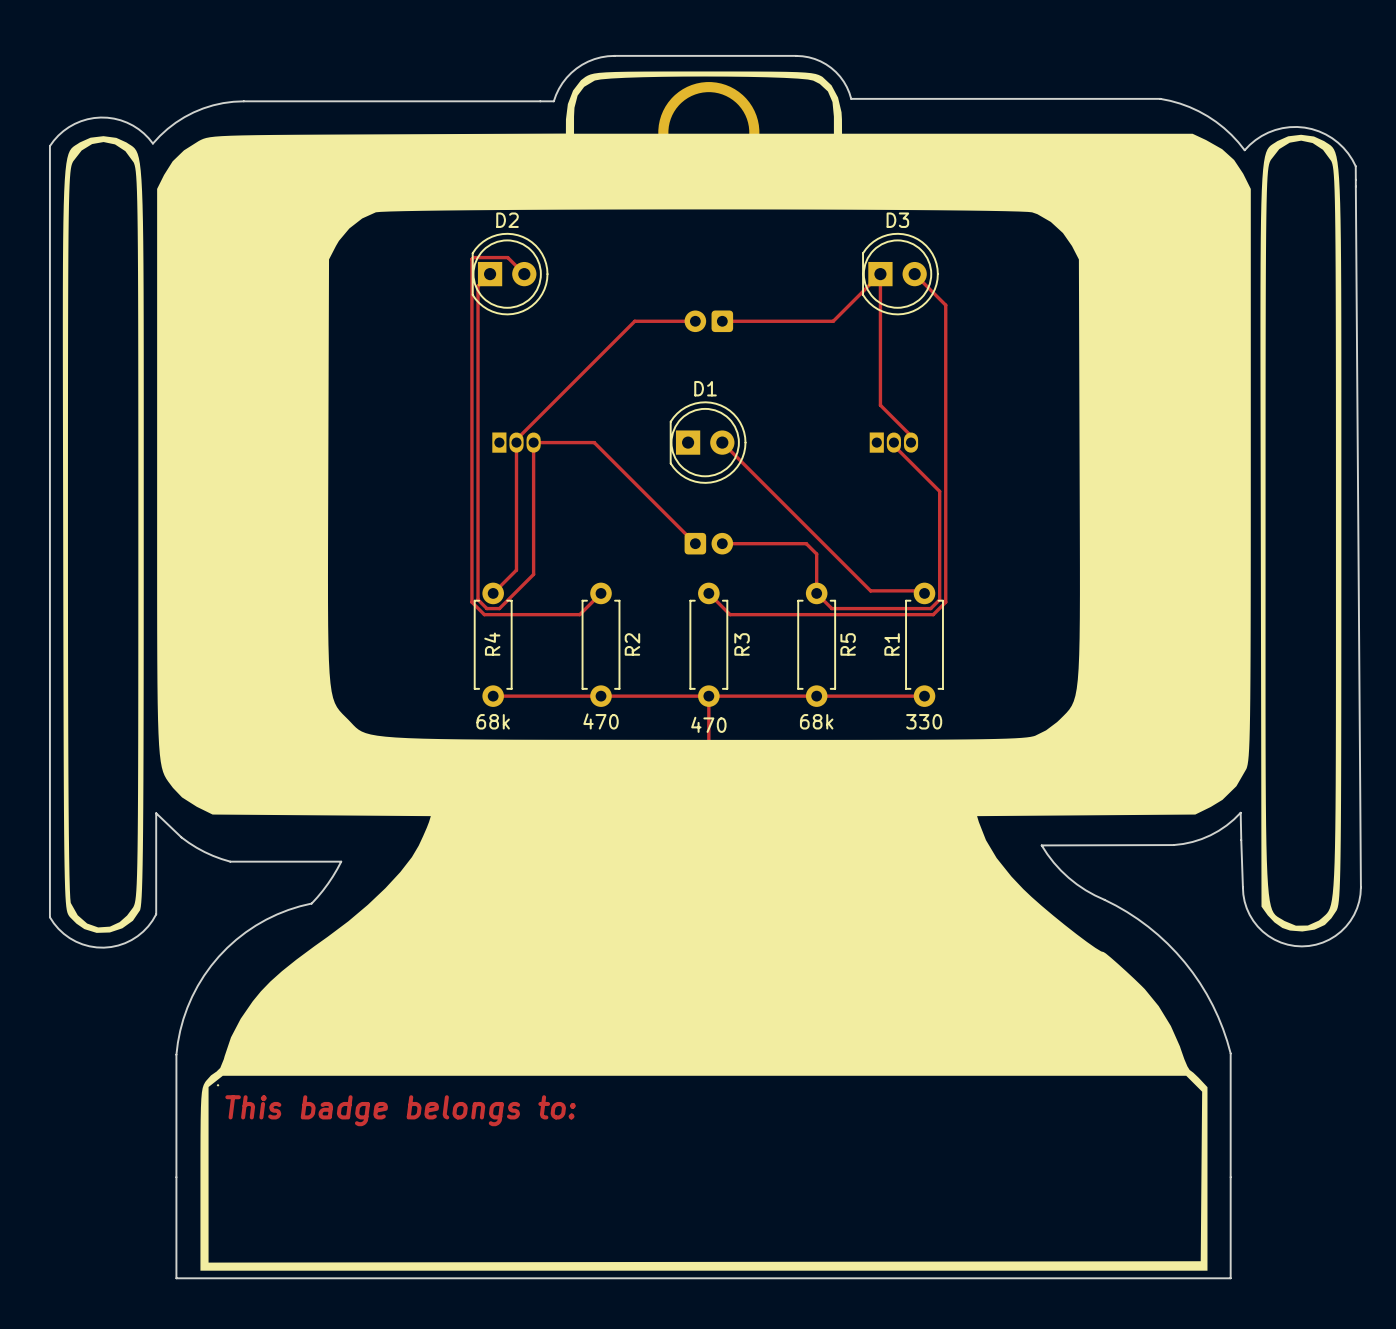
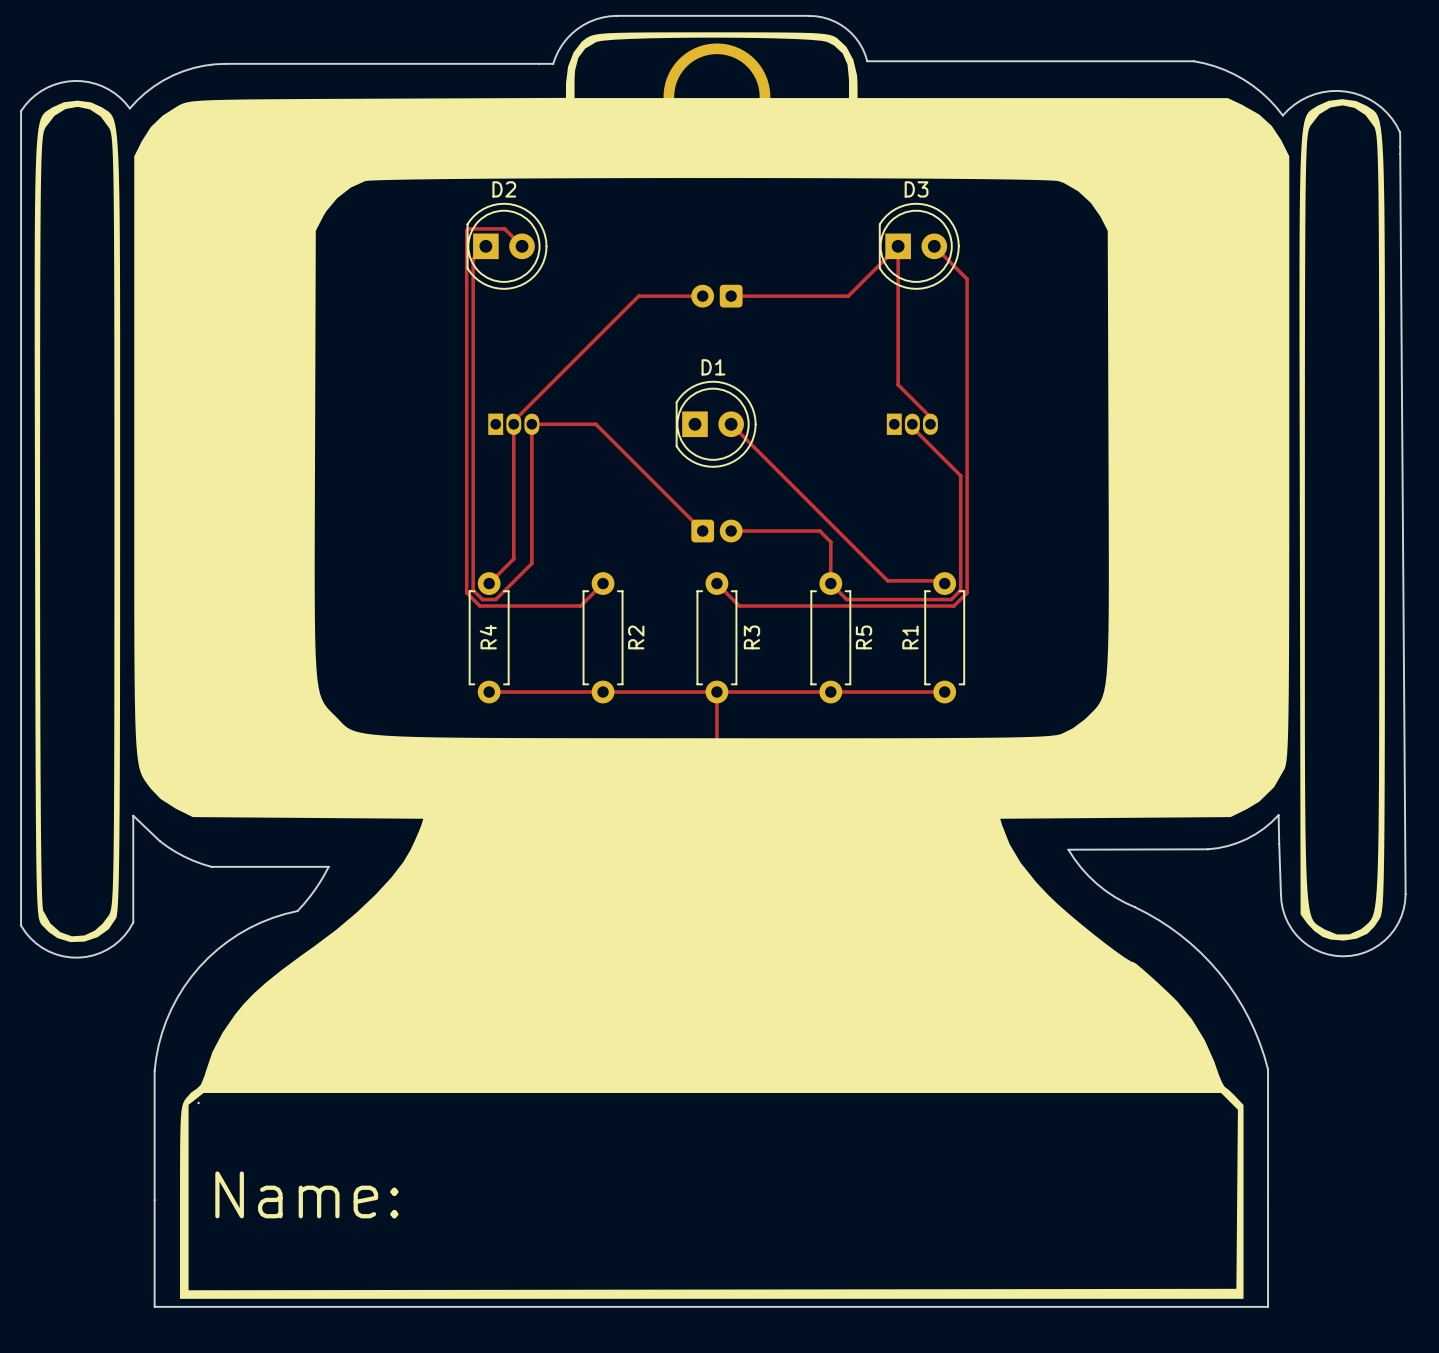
text: 68k (493, 721) -> none
text: 470 (601, 721) -> none
text: 68k (816, 721) -> none
text: 330 (924, 721) -> none
text: 470 (708, 724) -> none
text: This badge belongs to: (400, 1110) -> none
text: none -> Name: (306, 1194)

